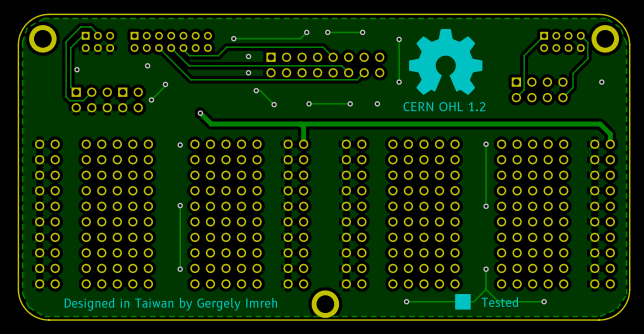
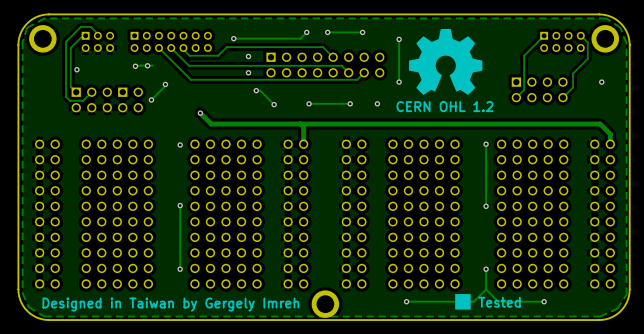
track: none -> (152, 65) (135, 66)
via: none -> (135, 66)

